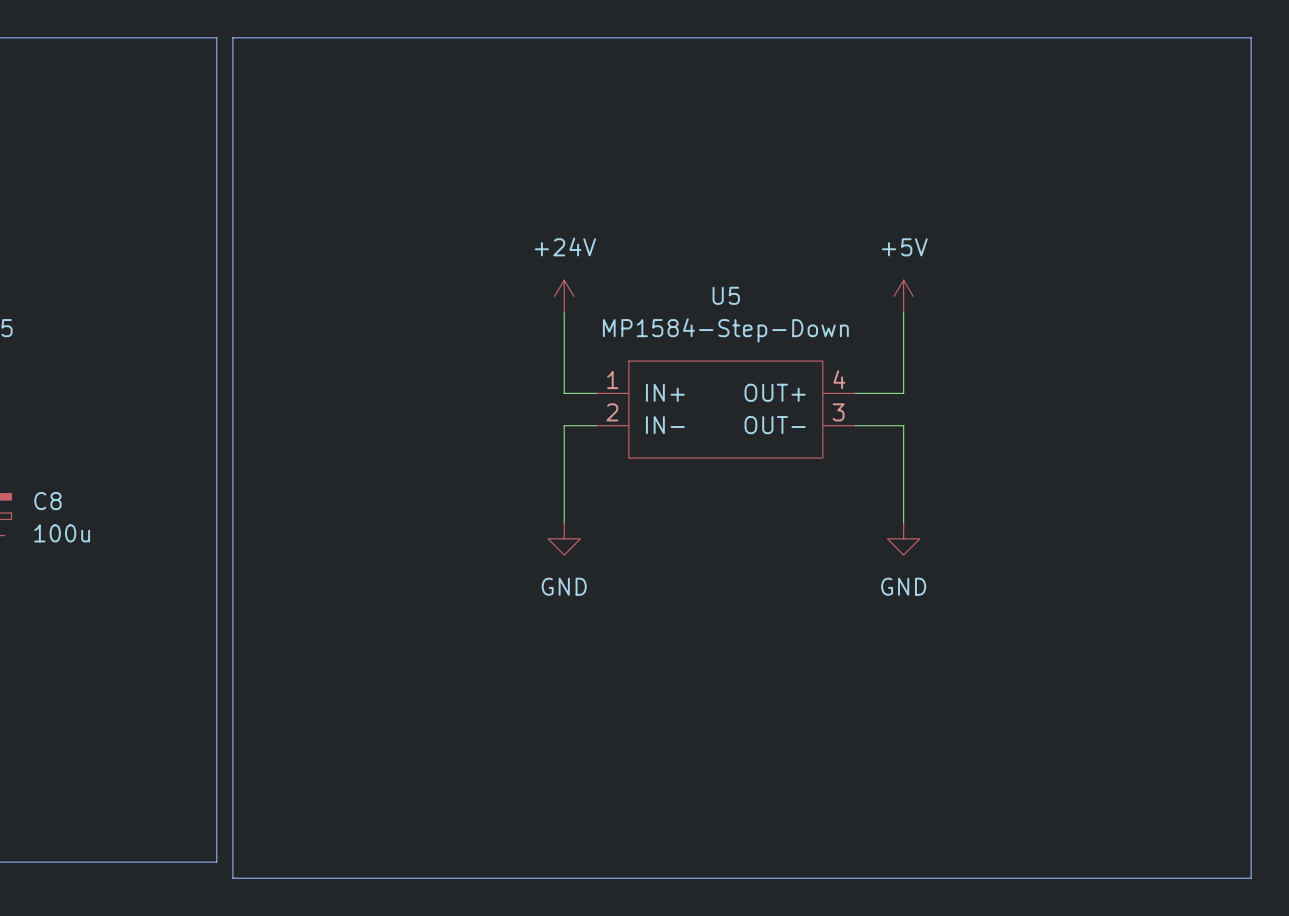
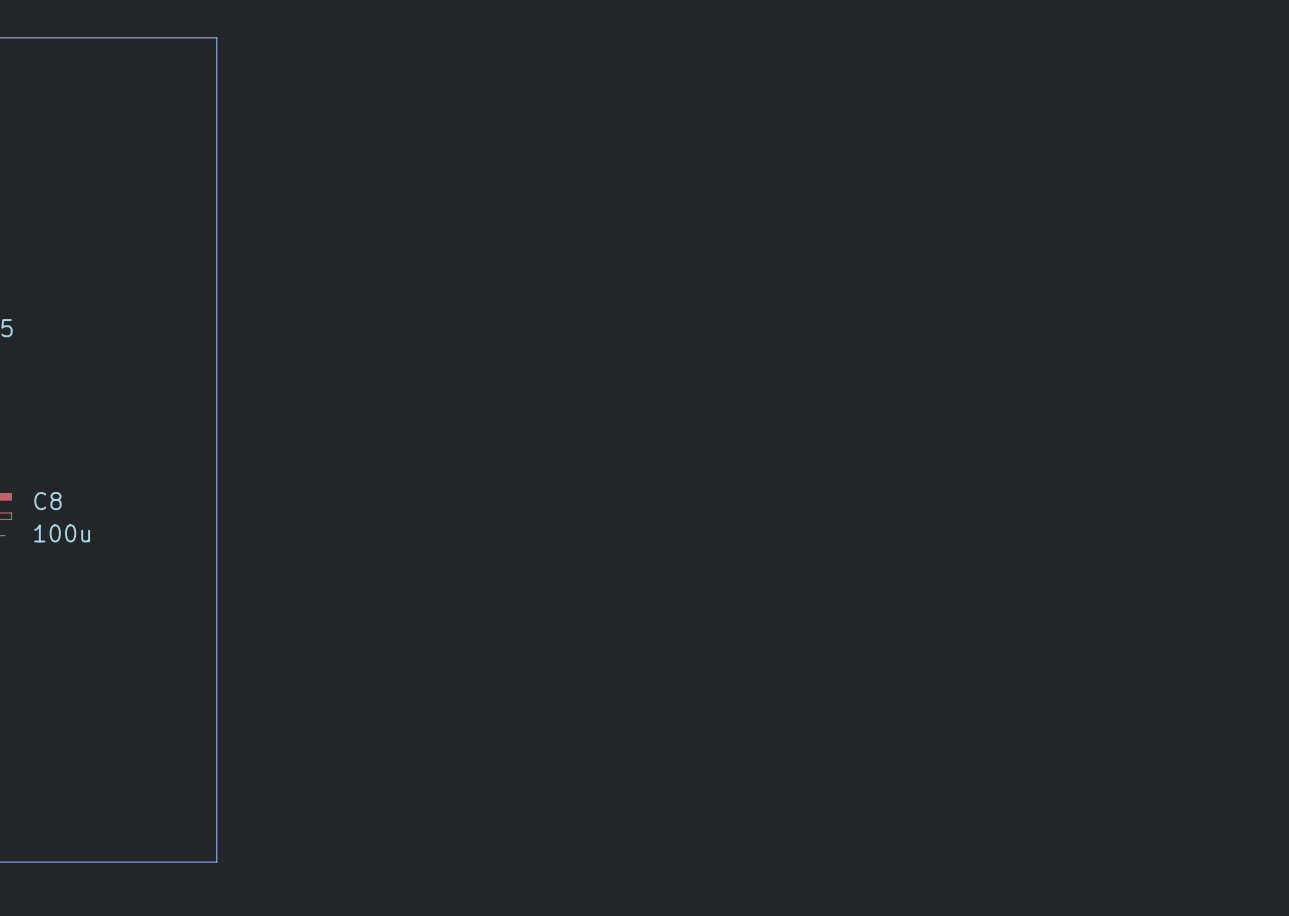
line: (232, 37) (1251, 37) (1251, 878) (232, 878) (232, 37) -> none
power symbol: +24V (564, 296) -> none
power symbol: +5V (903, 296) -> none
wire: (564, 312) (564, 393) (596, 393) -> none
wire: (903, 312) (903, 393) (855, 393) -> none
U5: MP1584-Step-Down (725, 409) -> none
wire: (596, 425) (564, 425) (564, 522) -> none
wire: (855, 425) (903, 425) (903, 522) -> none
power symbol: GND (564, 538) -> none
power symbol: GND (903, 538) -> none

